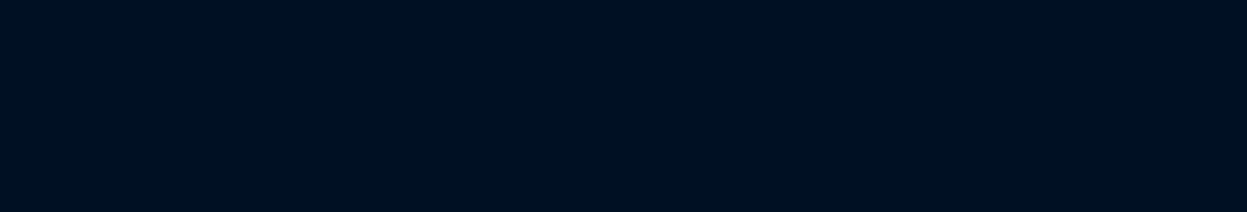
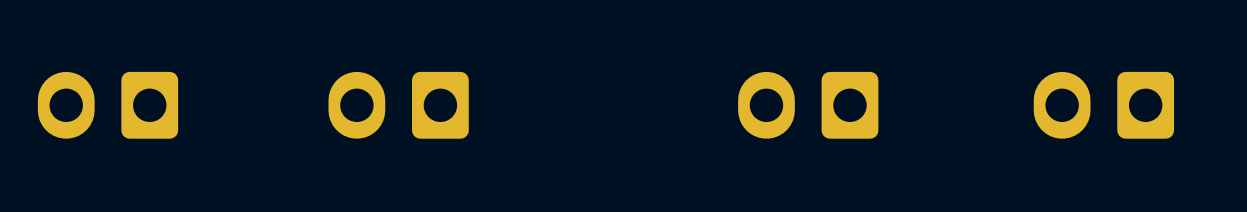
part: none -> (107, 105)
part: none -> (398, 105)
part: none -> (808, 105)
part: none -> (1103, 105)

